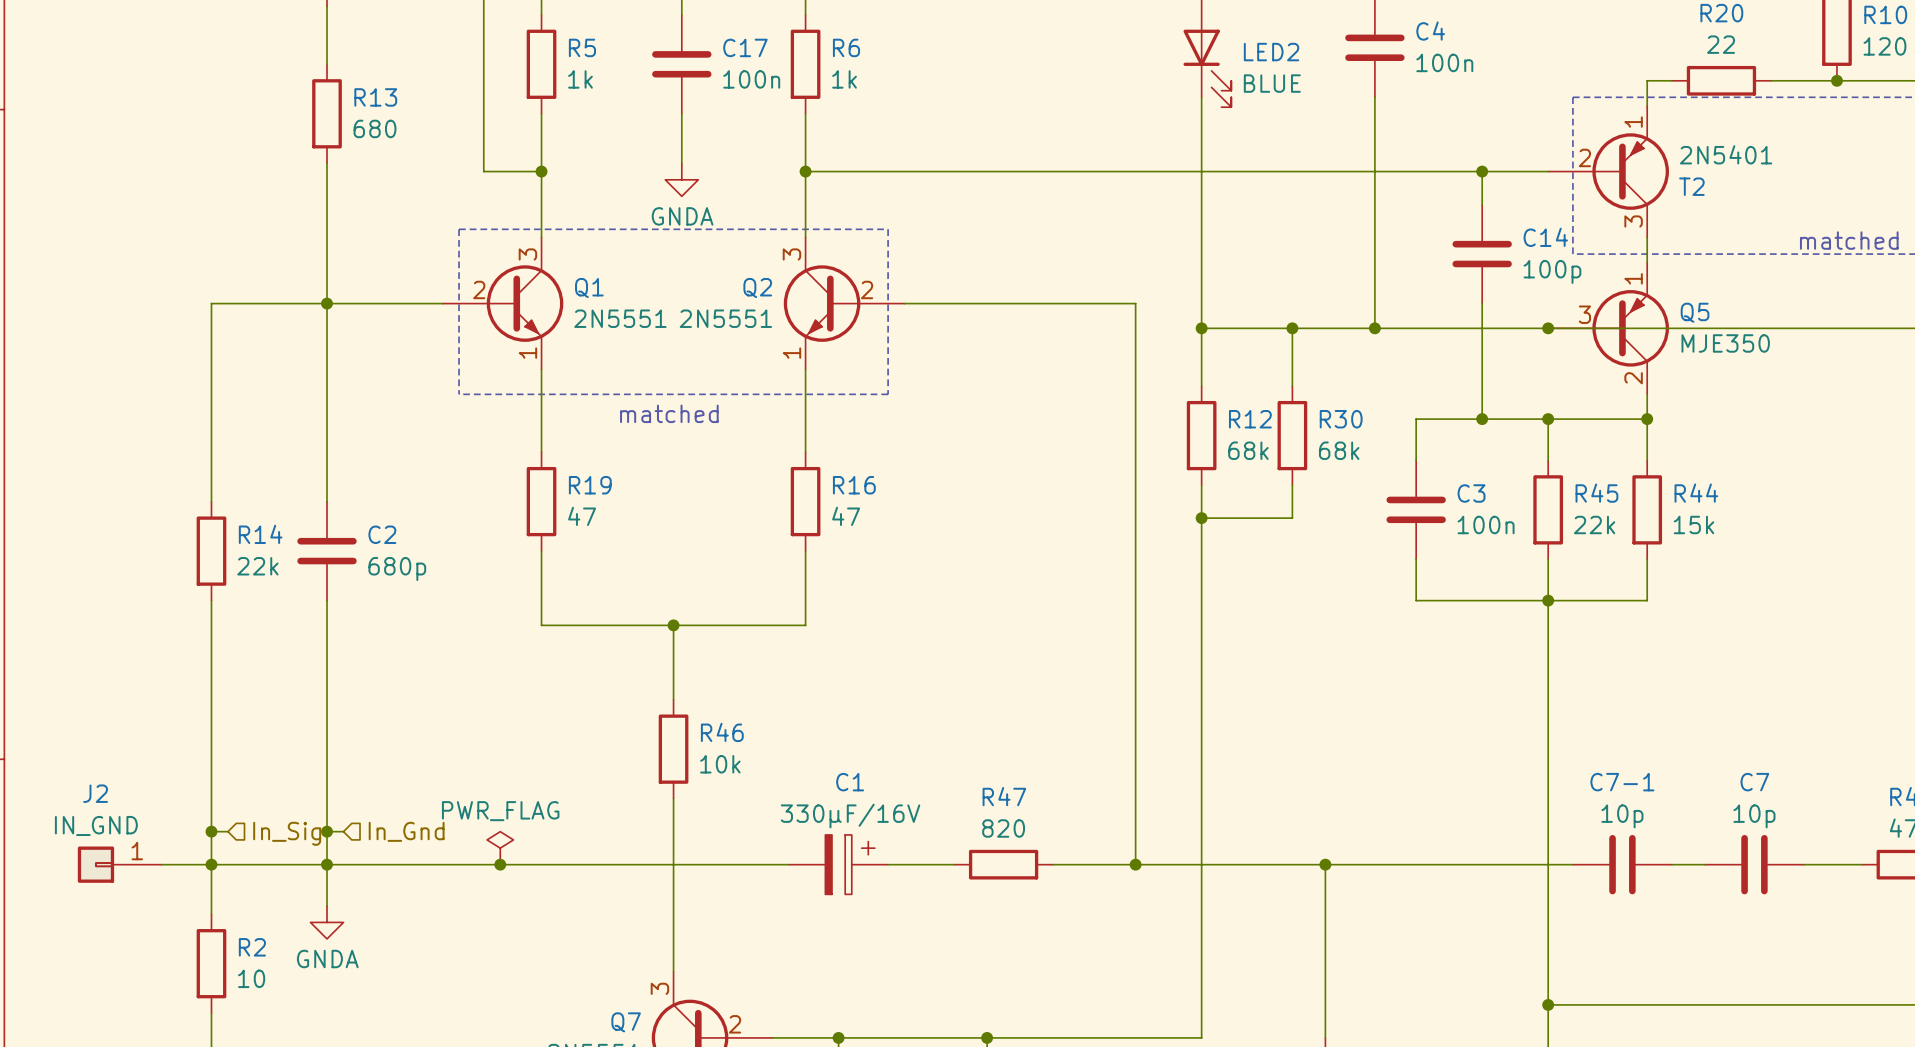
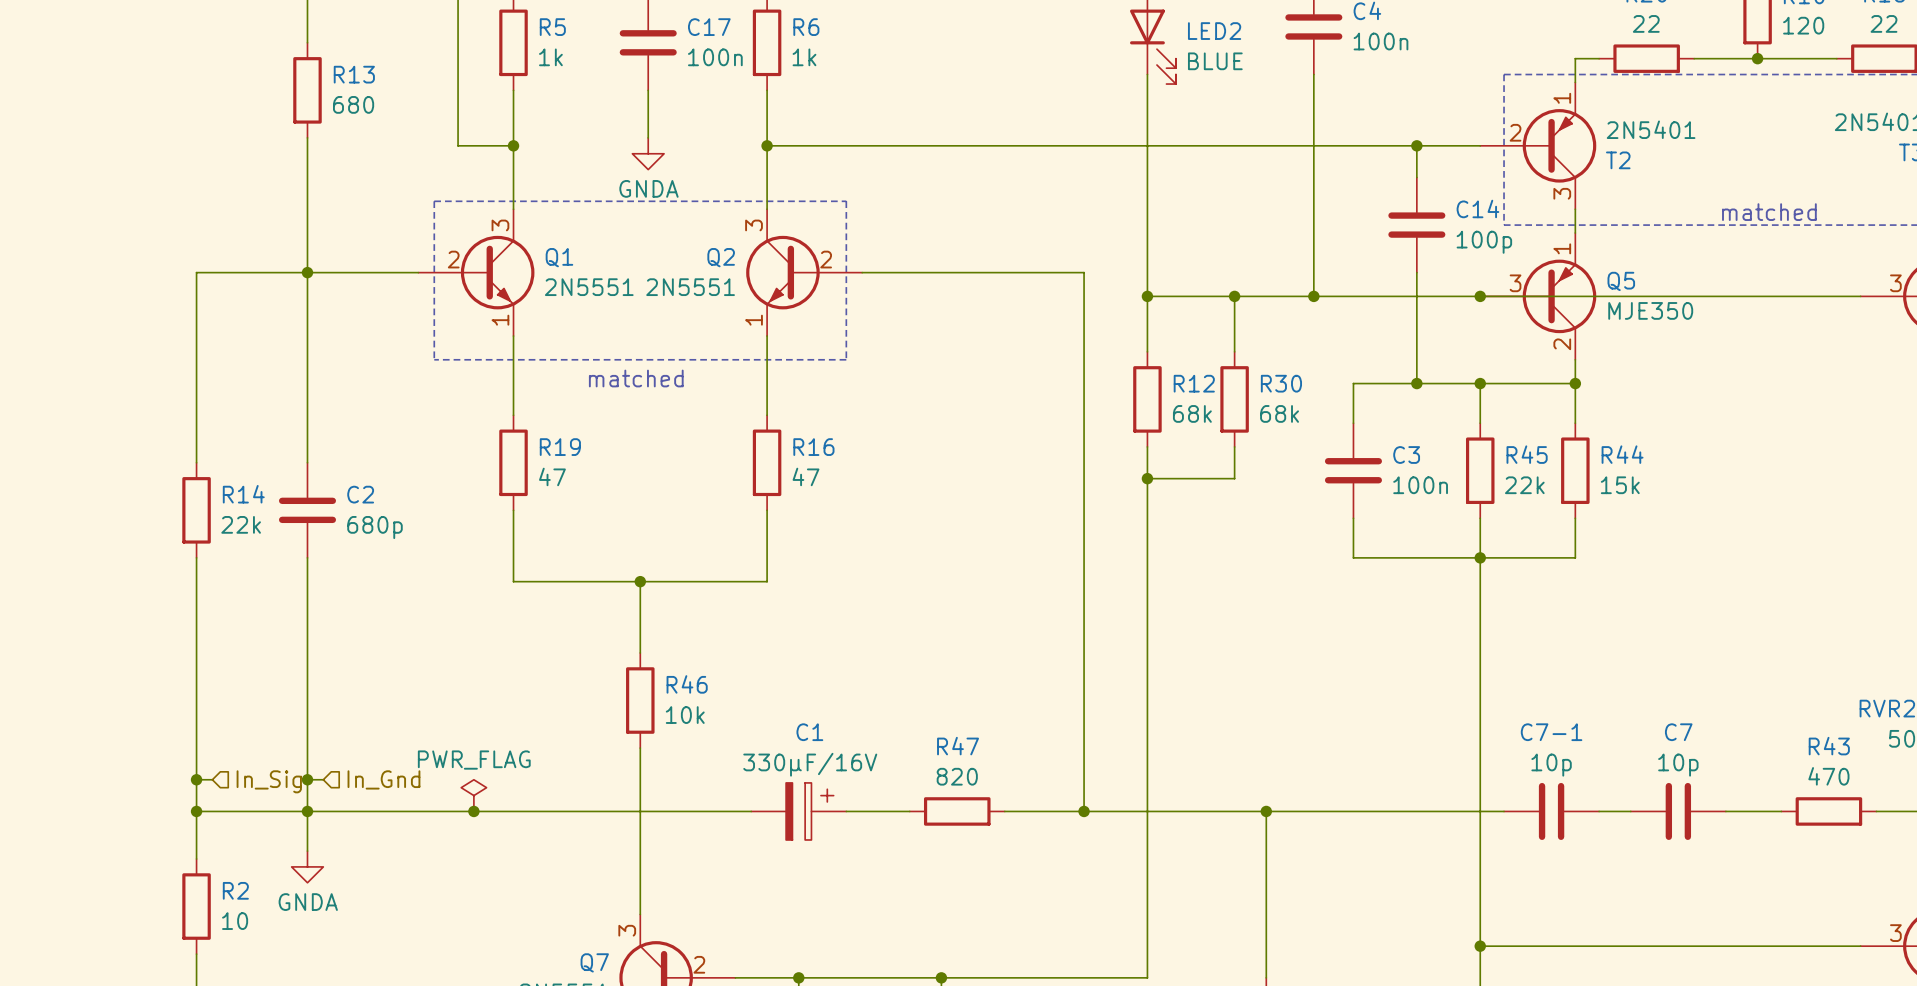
J2: IN_GND (119, 864) -> none
wire: (161, 864) (211, 864) -> none

